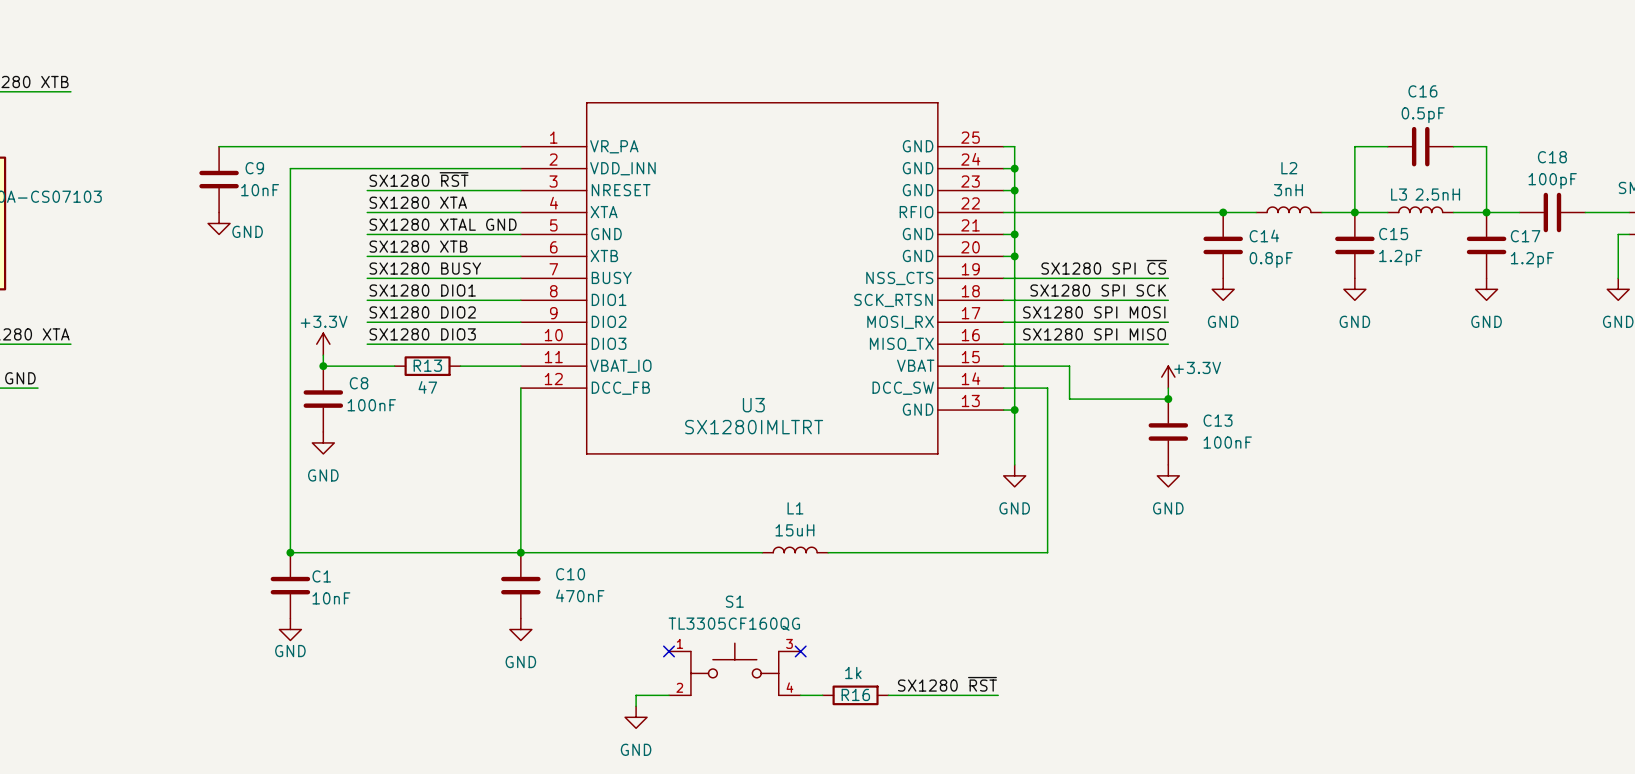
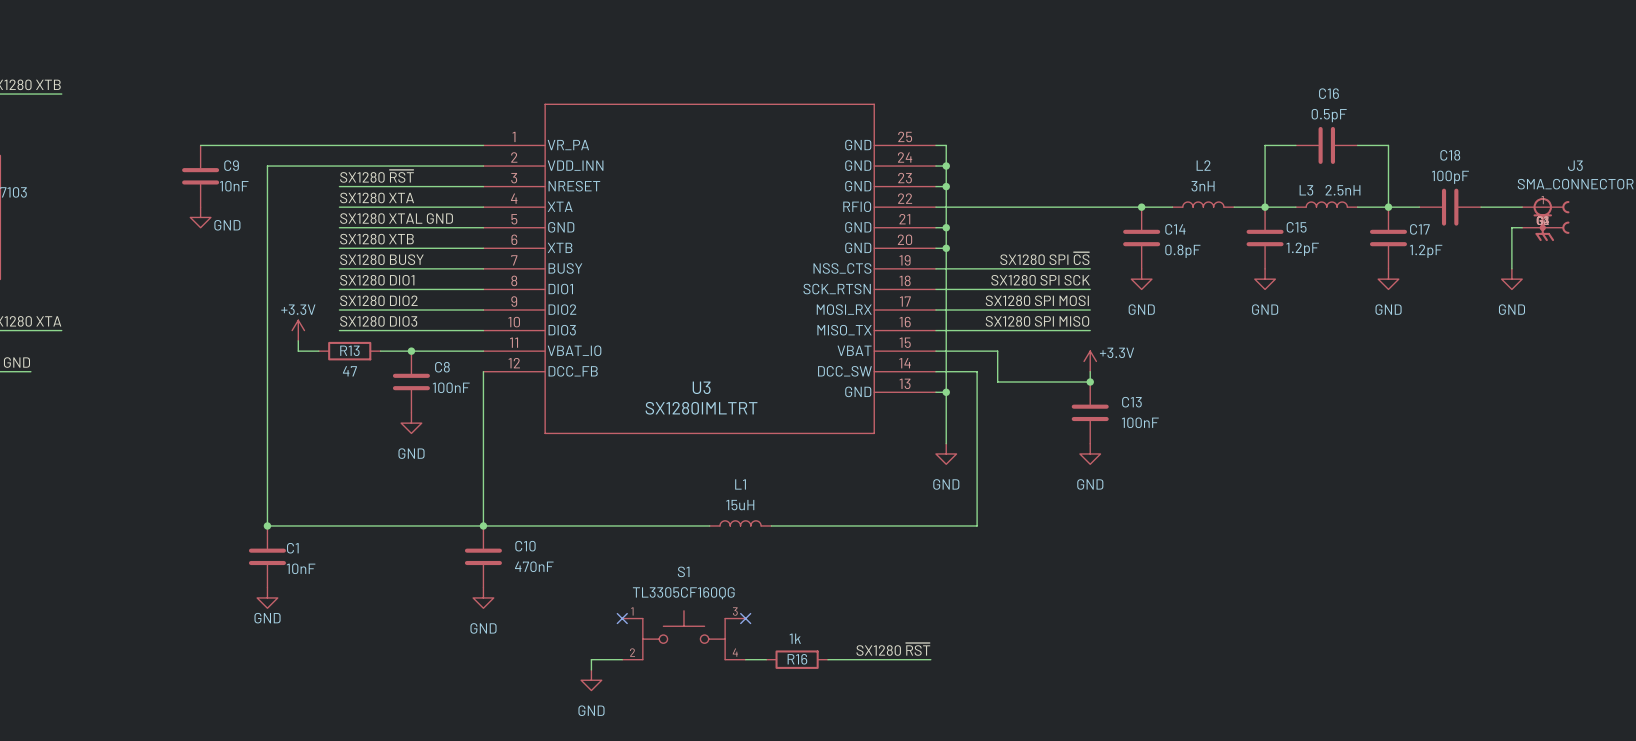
junction: (323, 366) -> none
wire: (345, 366) (394, 366) -> (380, 351) (426, 351)
R13 position: (427, 366) -> (349, 351)
junction: none -> (411, 351)
C8 position: (323, 399) -> (411, 381)
power symbol position: GND (323, 442) -> GND (411, 423)

